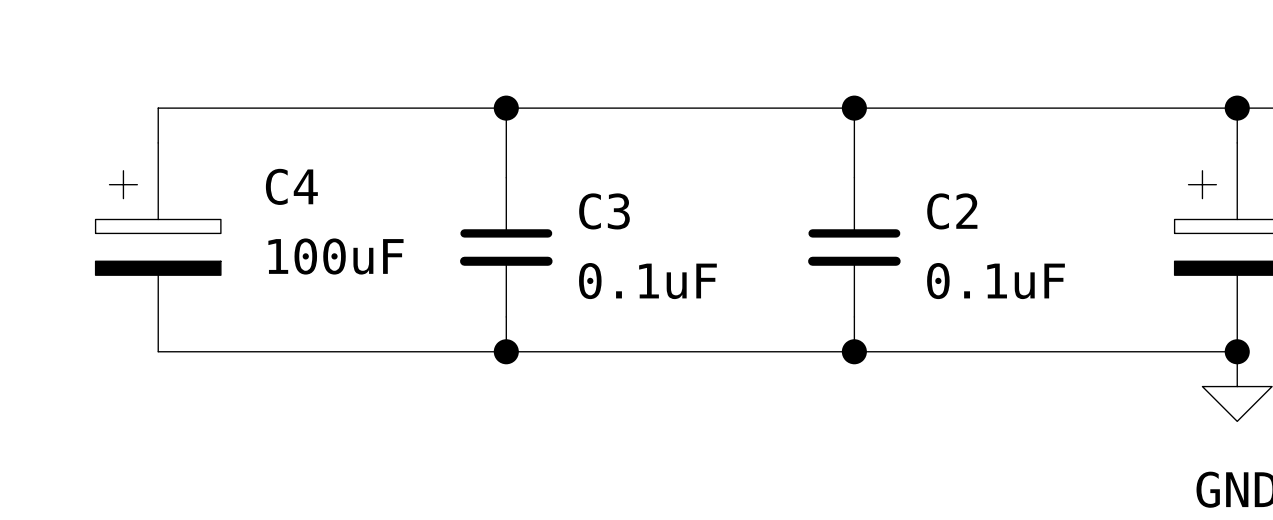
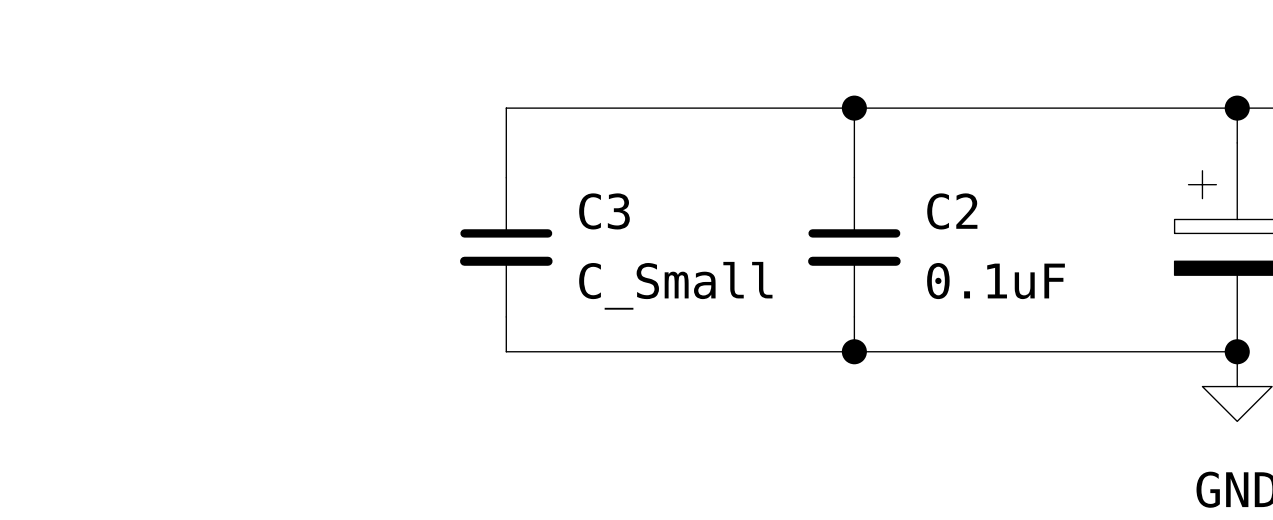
wire: (506, 108) (158, 108) (158, 142) -> none
junction: (506, 108) -> none
C4: 100uF (158, 247) -> none
C3 value: 0.1uF (647, 281) -> C_Small (675, 285)
wire: (158, 351) (506, 351) -> none
junction: (506, 351) -> none

